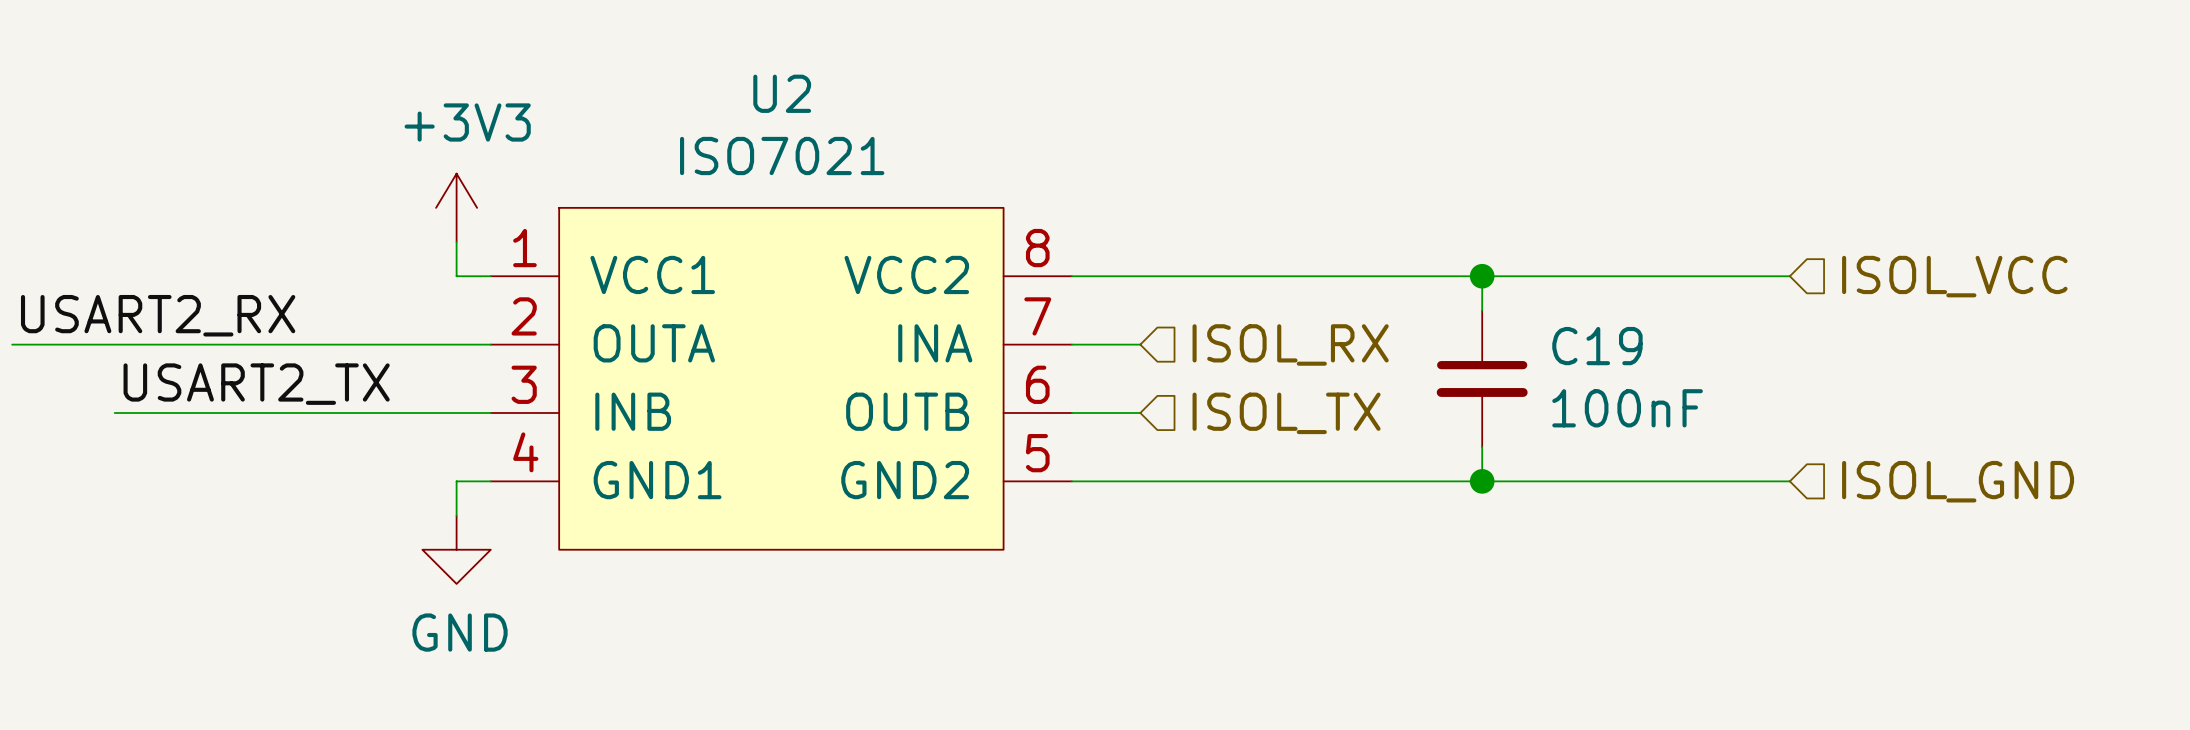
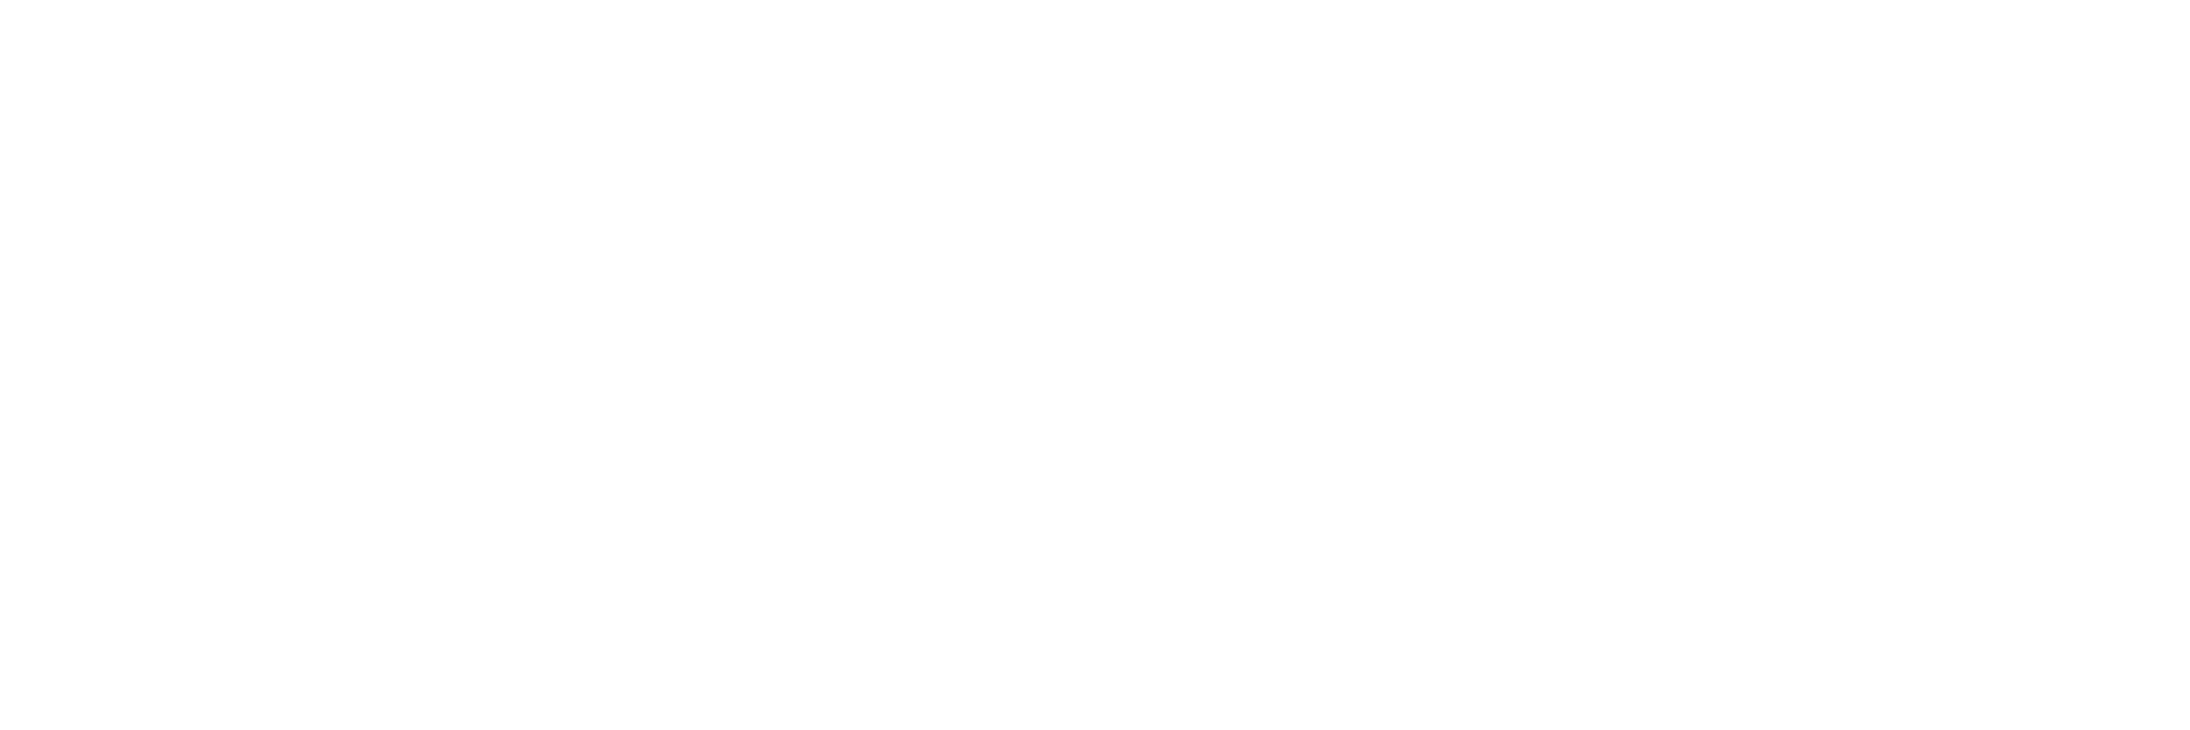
power symbol: +3V3 (456, 207) -> none
wire: (456, 242) (456, 276) (490, 276) -> none
wire: (1071, 276) (1789, 276) -> none
wire: (1482, 276) (1482, 310) -> none
junction: (1482, 276) -> none
hierarchical label: ISOL_VCC (1954, 276) -> none
label: USART2_RX (158, 315) -> none
wire: (12, 344) (490, 344) -> none
wire: (1071, 344) (1140, 344) -> none
hierarchical label: ISOL_RX (1290, 344) -> none
U2: ISO7021 (781, 378) -> none
C19: 100nF (1482, 378) -> none
label: USART2_TX (256, 384) -> none
wire: (114, 412) (490, 412) -> none
wire: (1071, 412) (1140, 412) -> none
hierarchical label: ISOL_TX (1286, 413) -> none
wire: (1482, 447) (1482, 481) -> none
wire: (490, 481) (456, 481) (456, 515) -> none
wire: (1071, 481) (1789, 481) -> none
junction: (1482, 481) -> none
hierarchical label: ISOL_GND (1958, 481) -> none
power symbol: GND (456, 549) -> none

